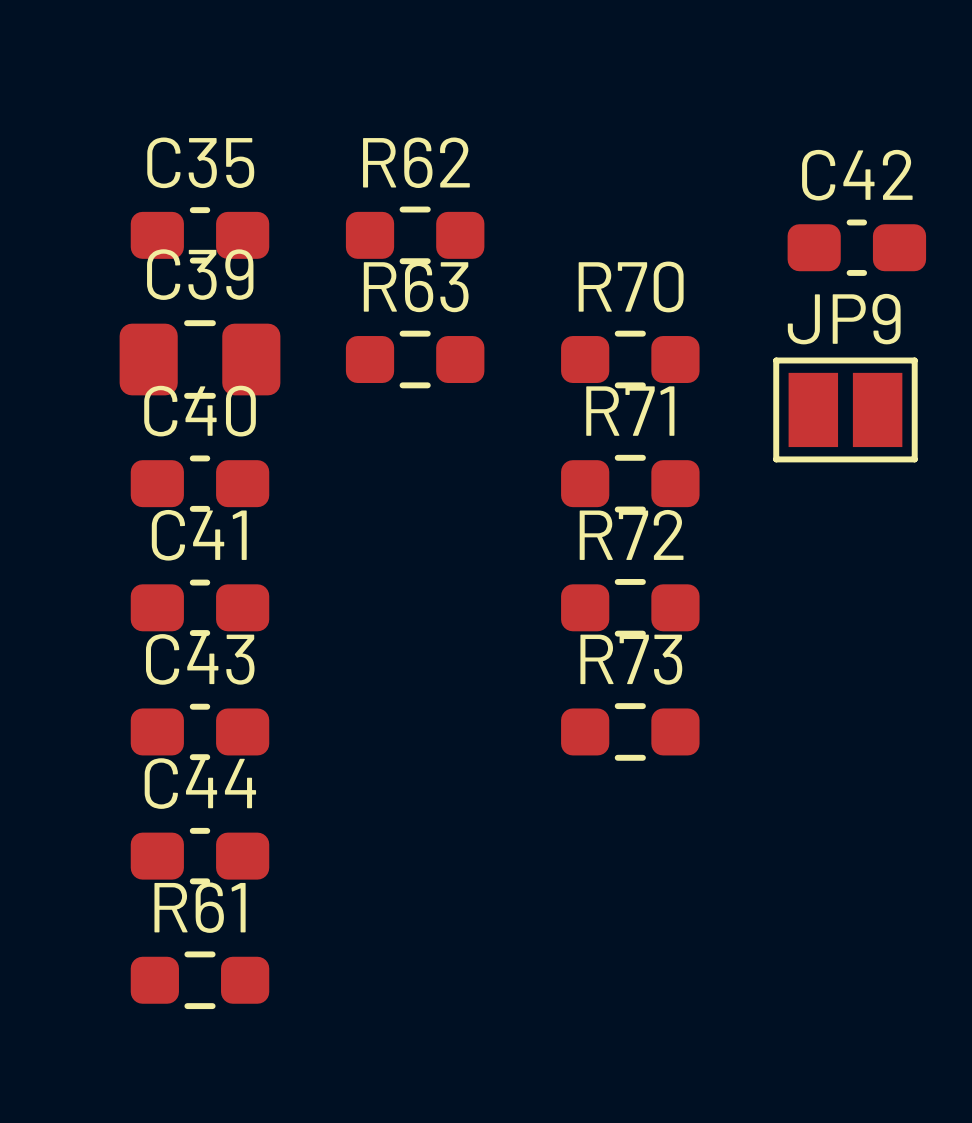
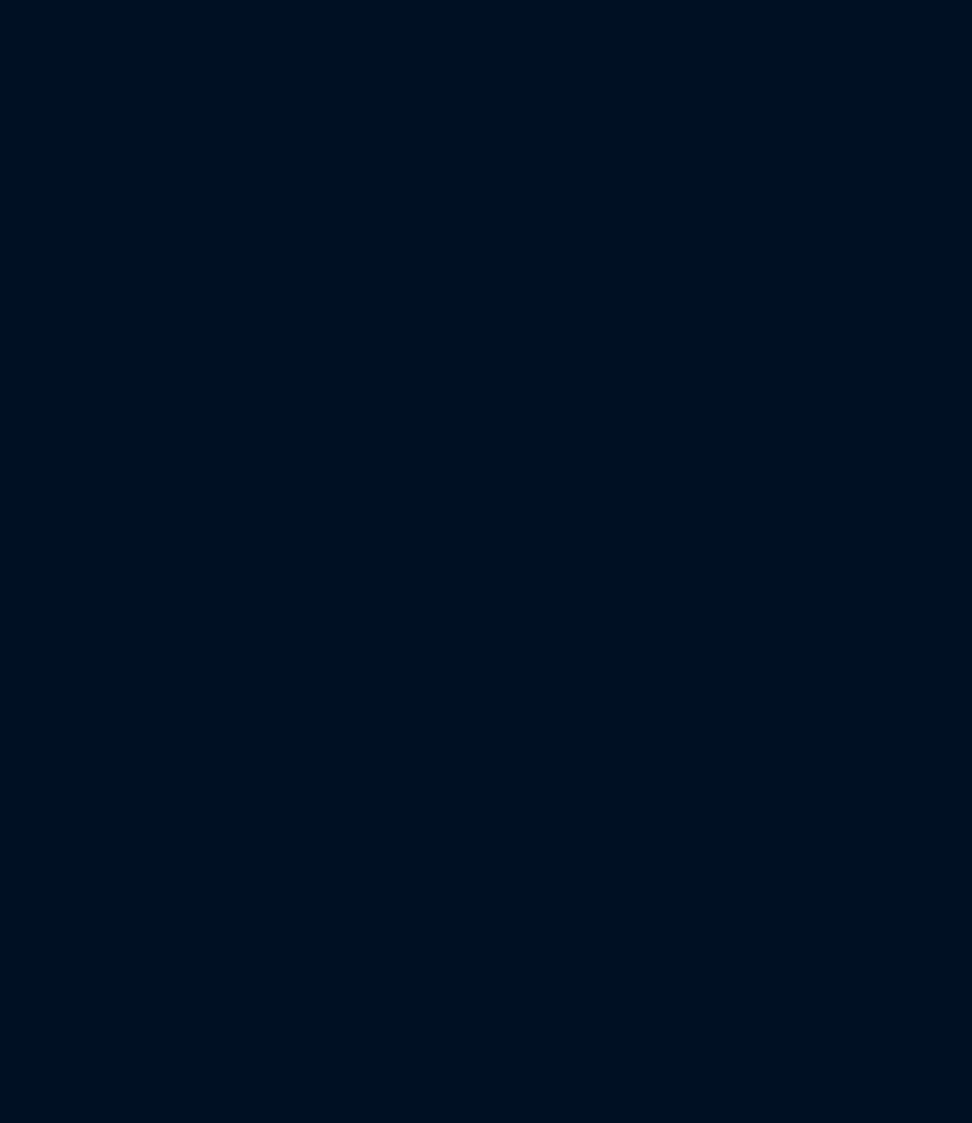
C35: (199, 235) -> none
R62: (415, 235) -> none
C42: (856, 247) -> none
C39: (199, 359) -> none
R63: (415, 359) -> none
R70: (630, 359) -> none
JP9: (845, 409) -> none
C40: (199, 483) -> none
R71: (630, 483) -> none
C41: (199, 607) -> none
R72: (630, 607) -> none
C43: (199, 731) -> none
R73: (630, 731) -> none
C44: (199, 856) -> none
R61: (199, 980) -> none

